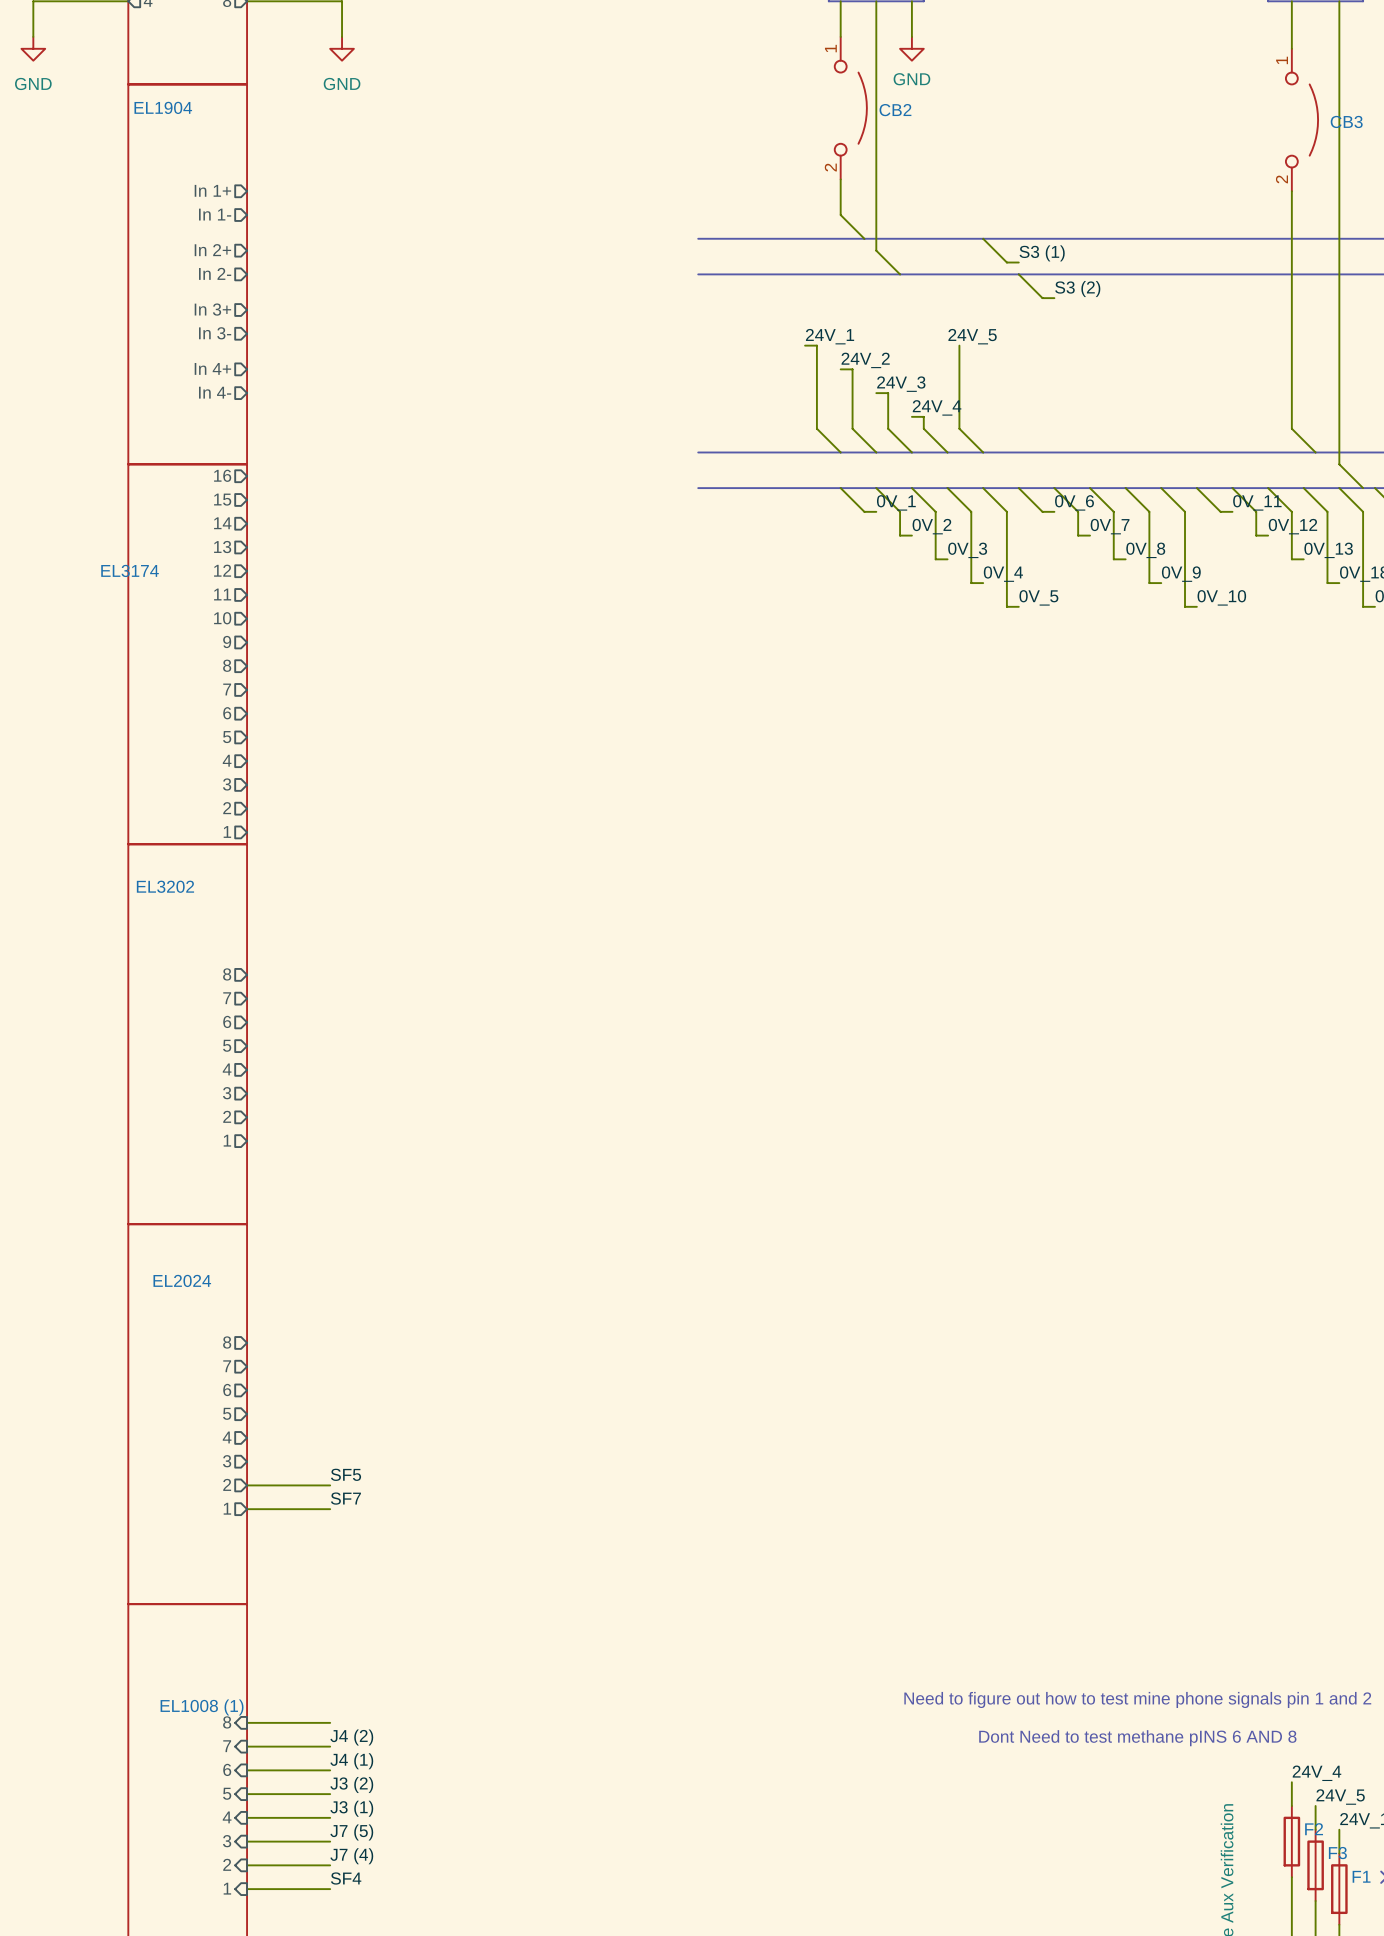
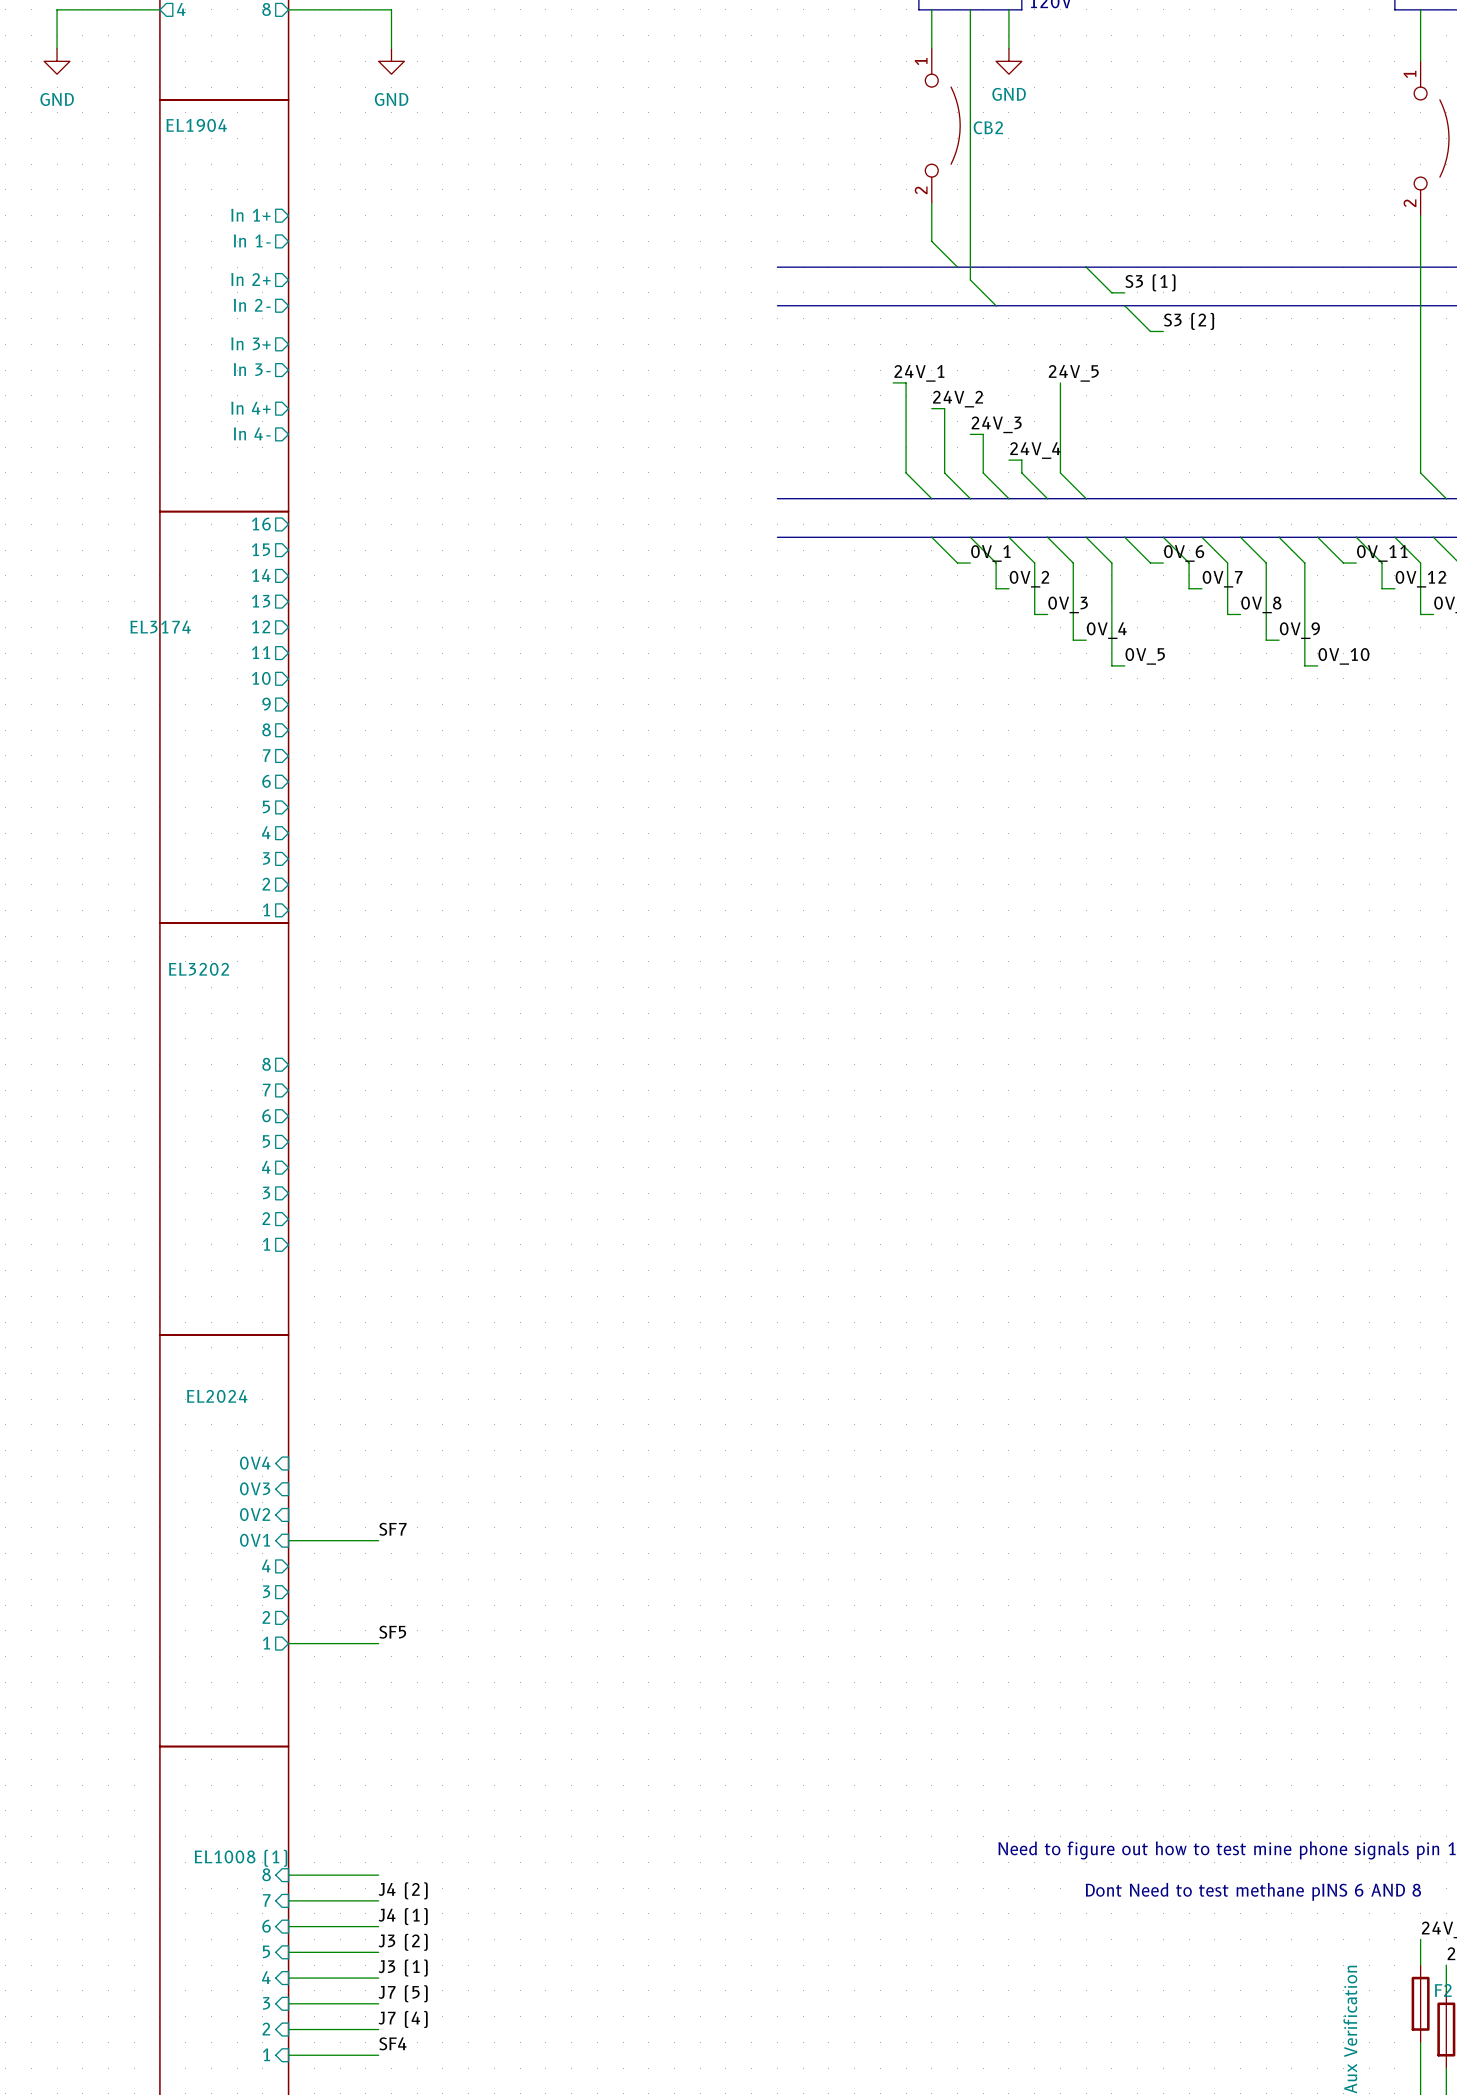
sheet pin shape: output (227, 1342) -> input (255, 1463)
sheet pin: 8 (227, 1342) -> 0V4 (255, 1463)
sheet pin shape: output (227, 1366) -> input (255, 1488)
sheet pin: 7 (227, 1366) -> 0V3 (255, 1488)
sheet pin shape: output (227, 1389) -> input (255, 1514)
sheet pin: 6 (227, 1389) -> 0V2 (255, 1514)
label: none -> SF7 (392, 1529)
sheet pin shape: output (227, 1413) -> input (255, 1540)
sheet pin: 5 (227, 1413) -> 0V1 (255, 1540)
label: SF5 (346, 1474) -> none
wire: (247, 1485) (330, 1485) -> (288, 1540) (378, 1540)
label: SF7 (345, 1498) -> SF5 (392, 1632)

